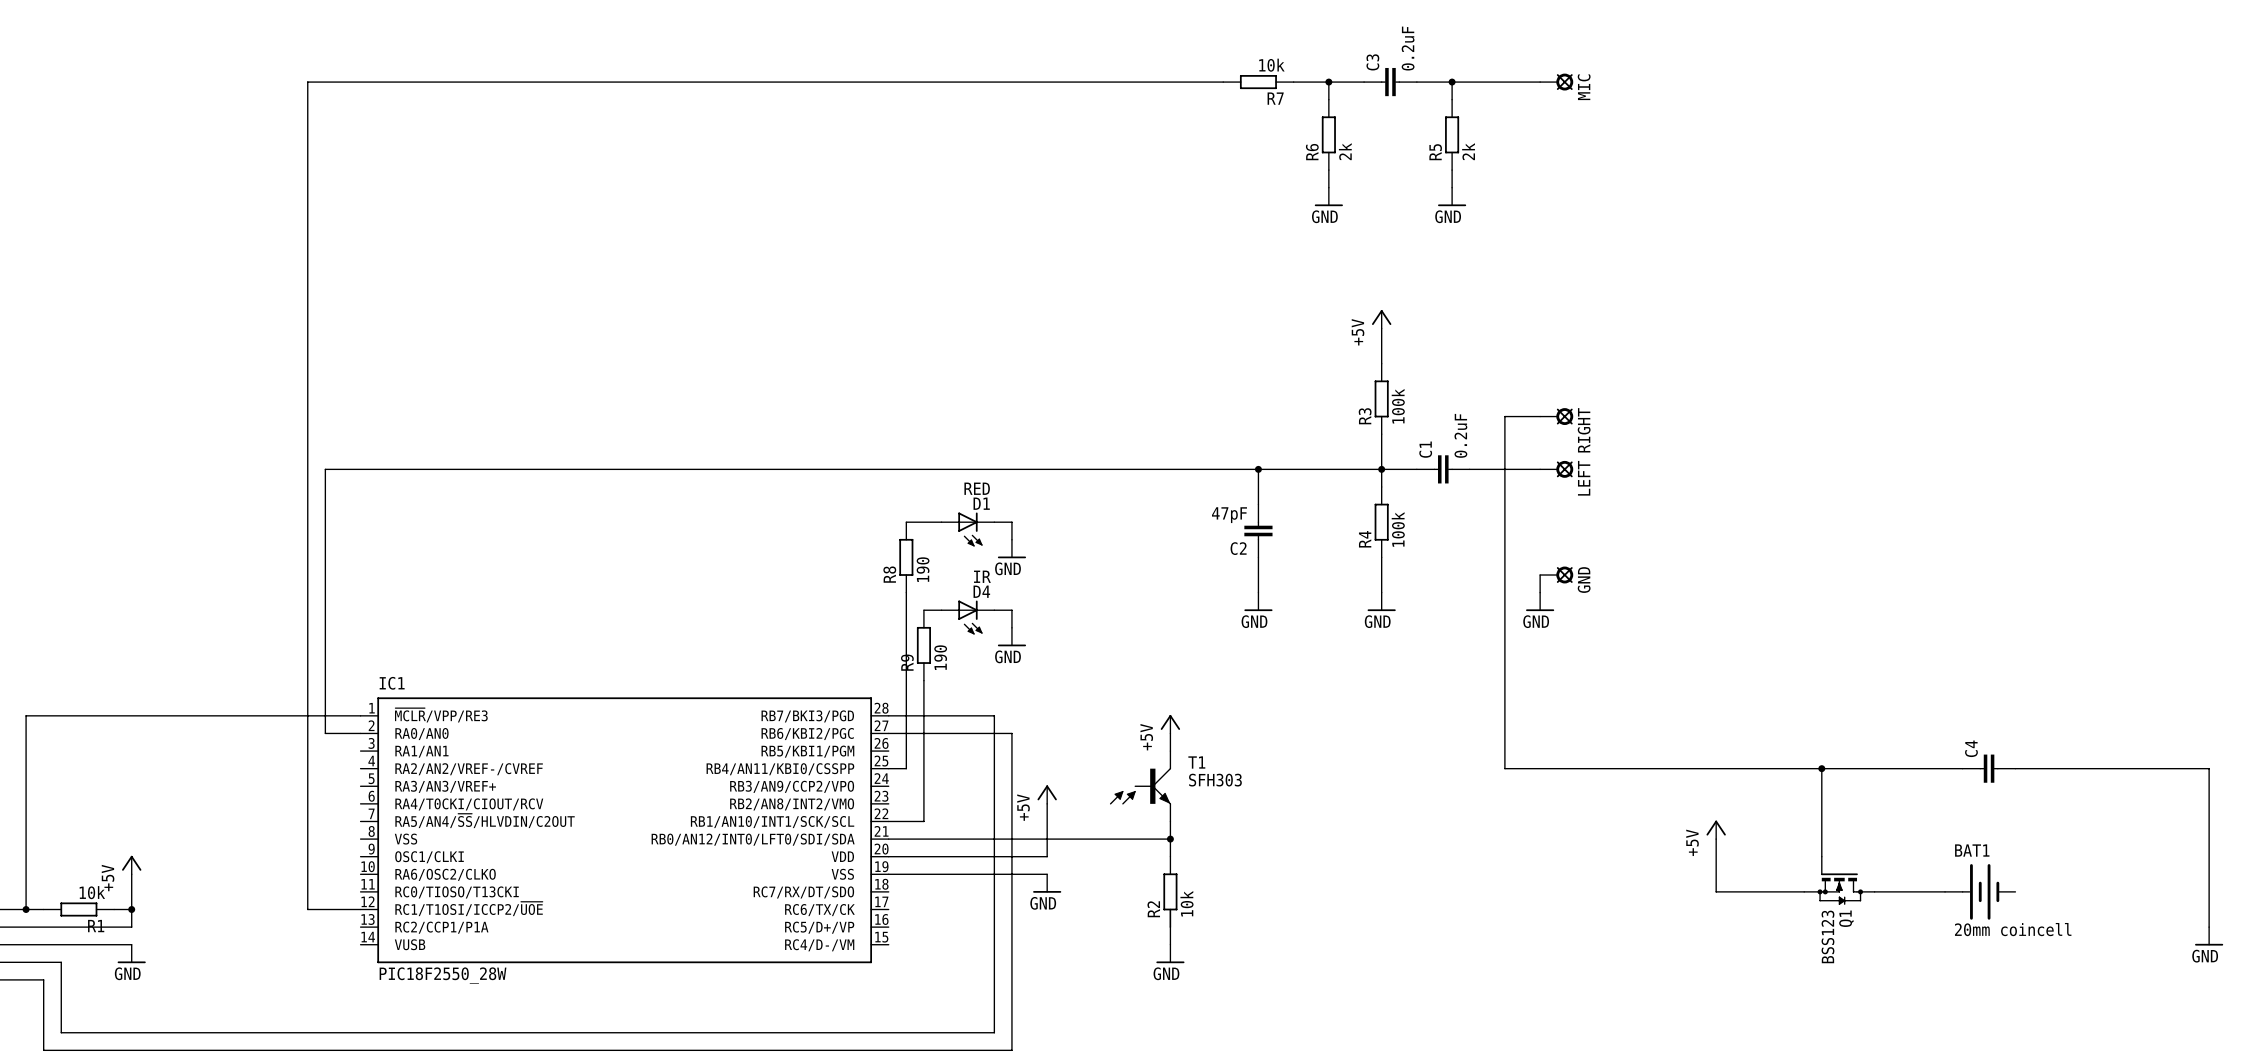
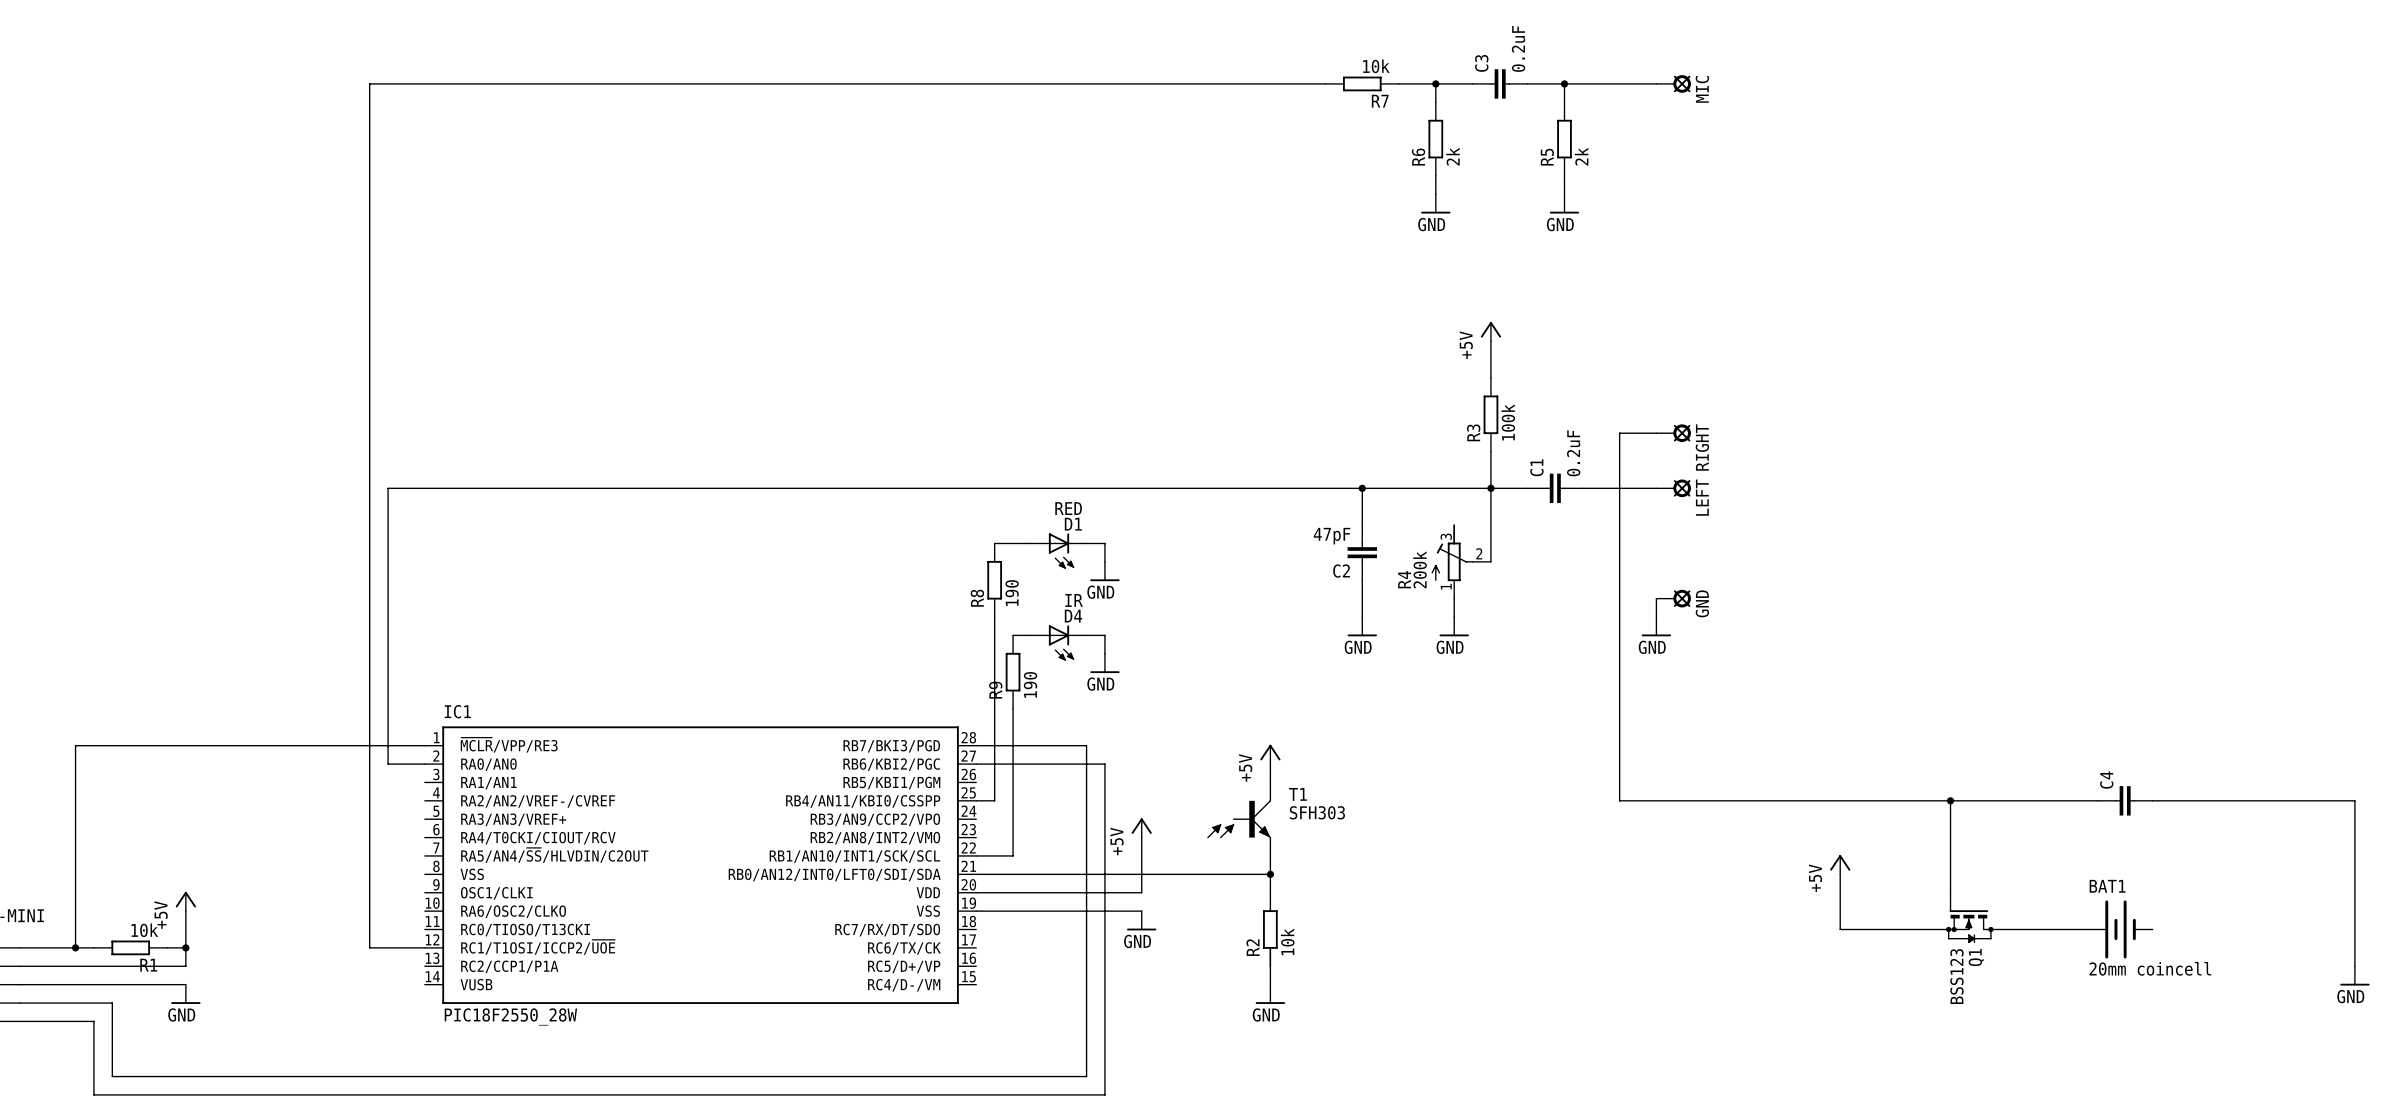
R4 symbol: [1374, 486, 1389, 558] -> [1431, 524, 1491, 599]
wire: none -> (1490, 506) (1490, 561)
R4 value: 100k (1398, 529) -> 200k (1420, 569)
R4 name position: R4 (1365, 539) -> R4 (1404, 579)
wire: (1381, 557) (1381, 592) -> none
wire: none -> (1454, 598) (1454, 617)
power symbol position: GND (1381, 601) -> GND (1454, 626)

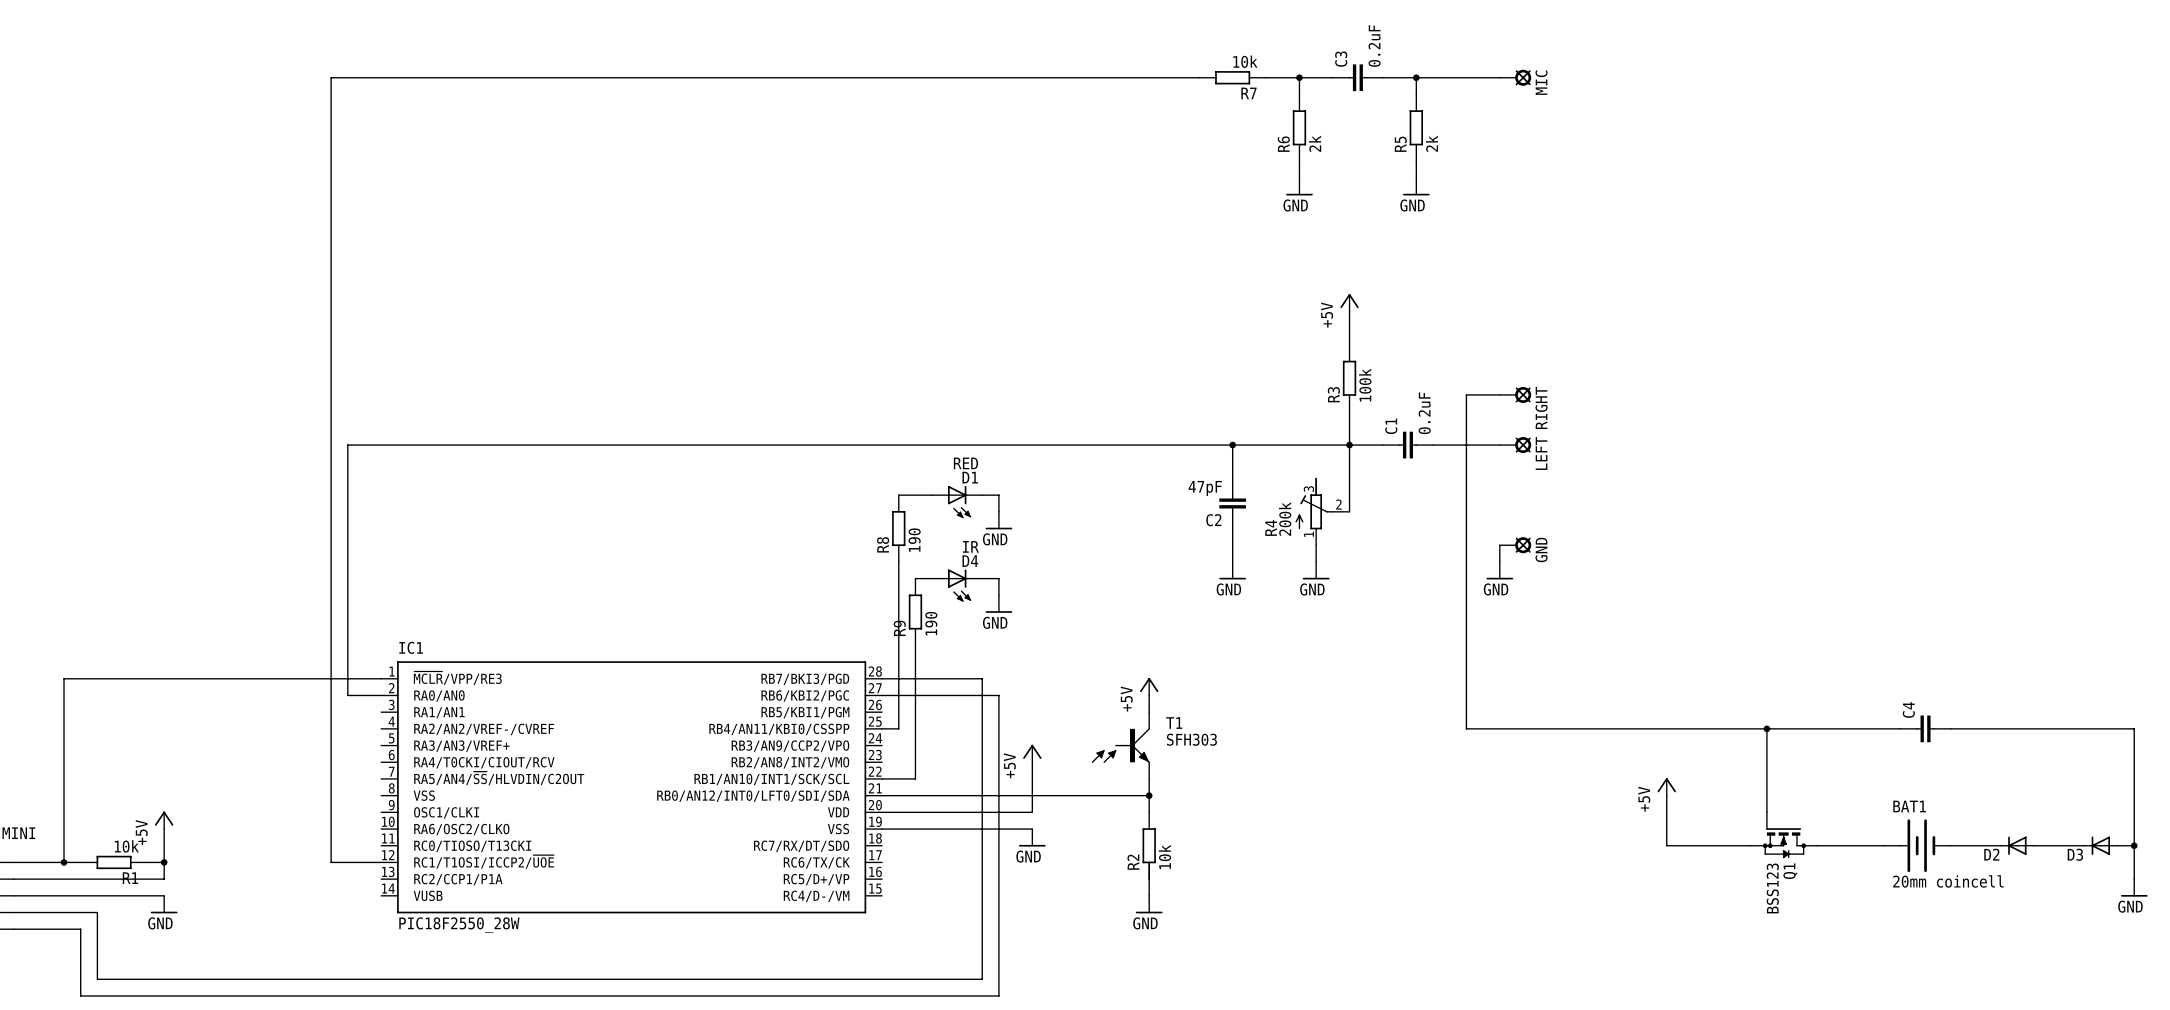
wire: none -> (1950, 845) (2000, 845)
D2: none -> (2017, 845)
wire: none -> (2034, 845) (2084, 845)
D3: none -> (2100, 845)
wire: none -> (2117, 845) (2134, 845)
junction: none -> (2134, 845)

